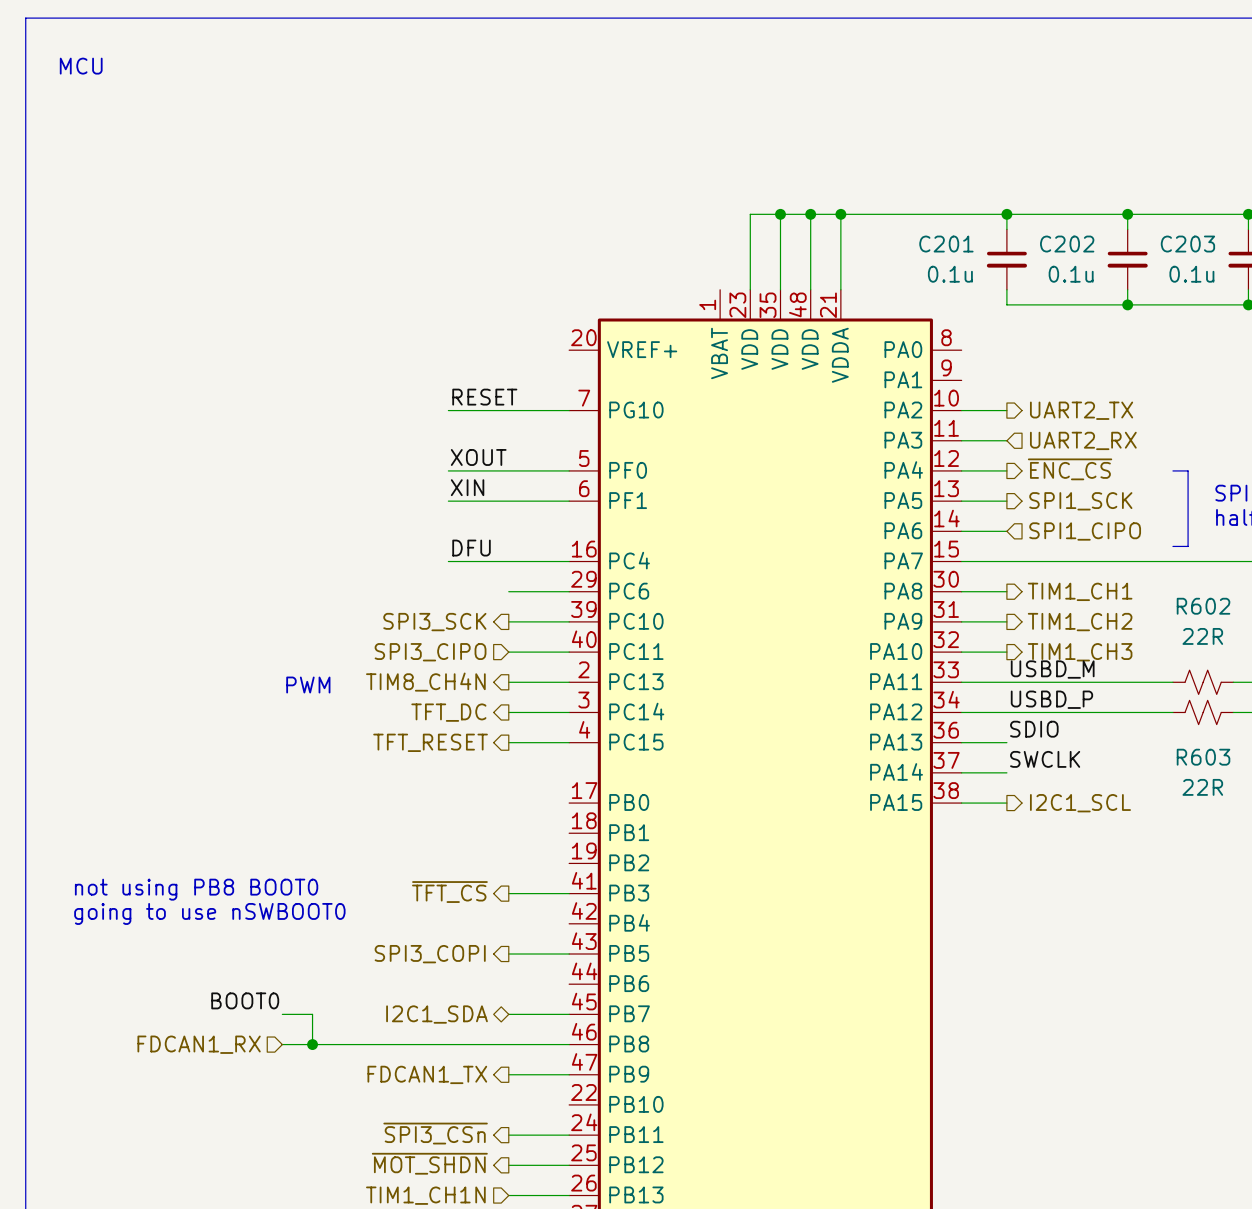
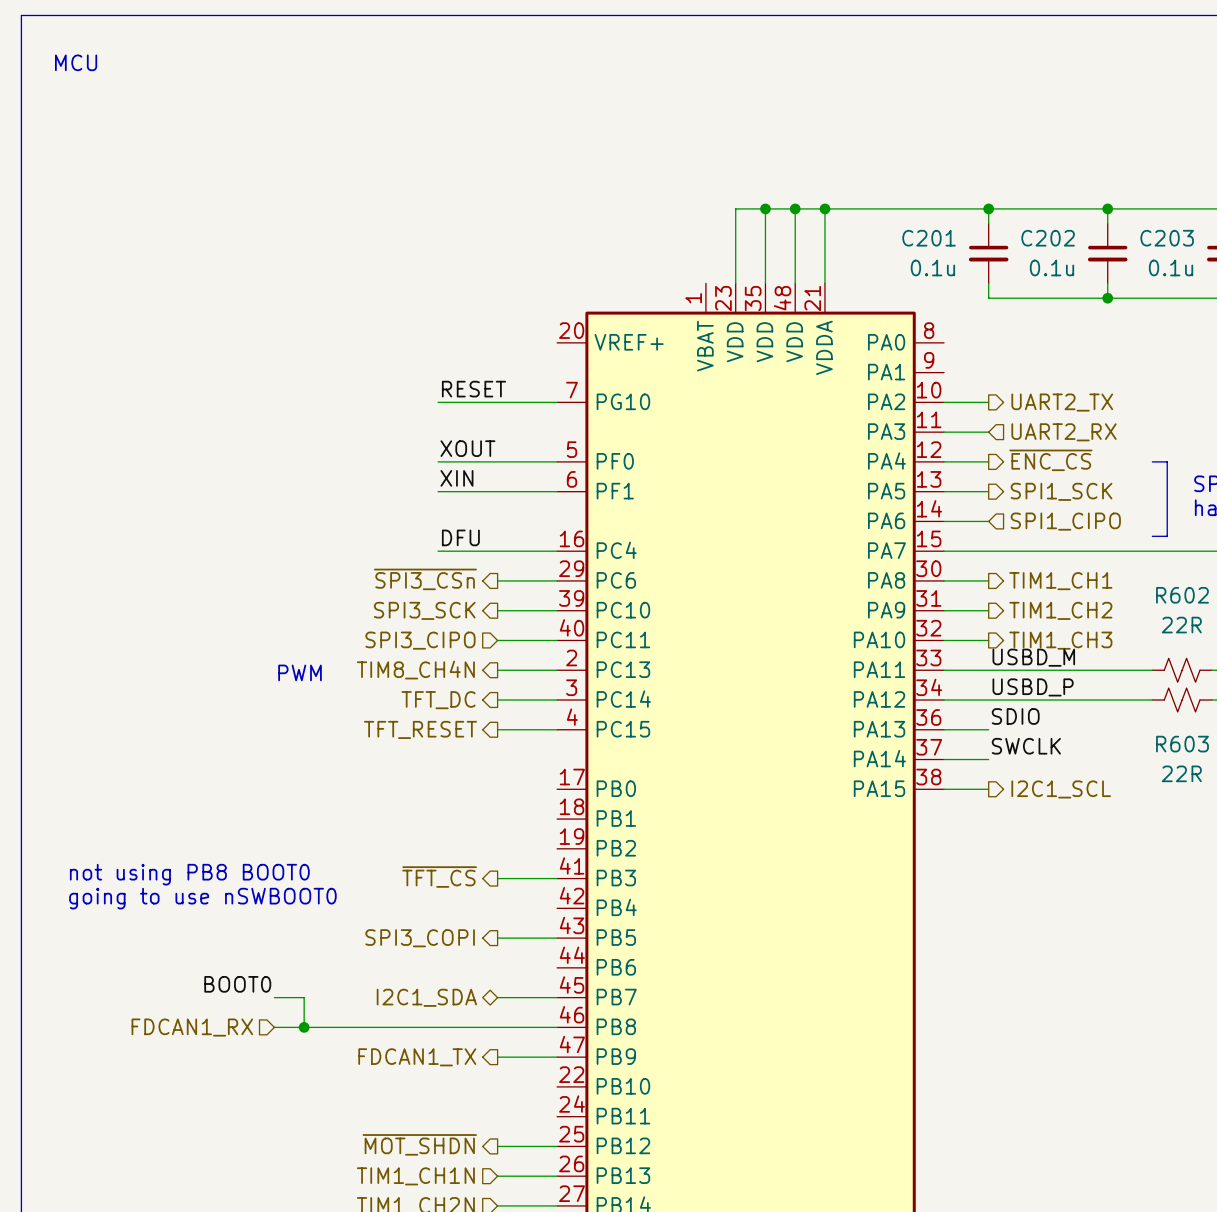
hierarchical label: none -> ~{SPI3_CSn} (425, 579)
hierarchical label: ~{SPI3_CSn} (435, 1133) -> none
wire: (508, 1135) (569, 1135) -> none

